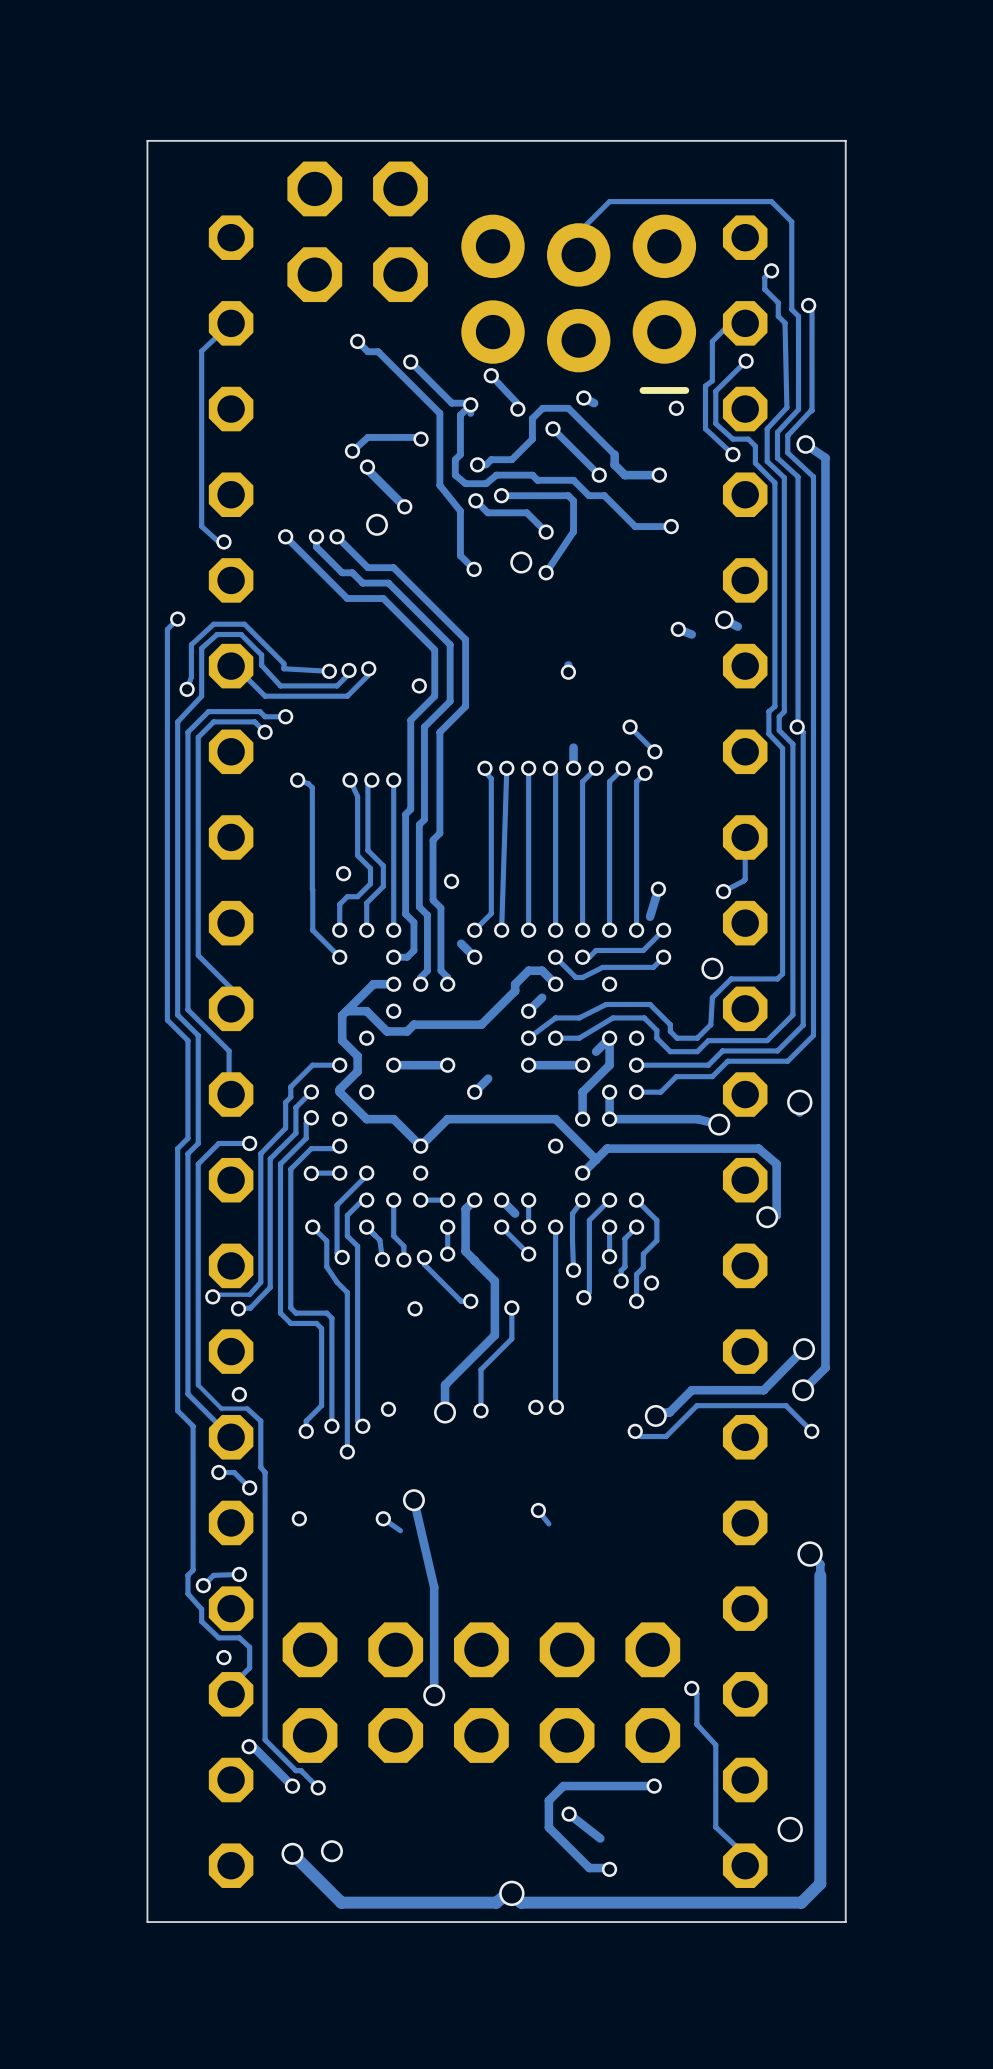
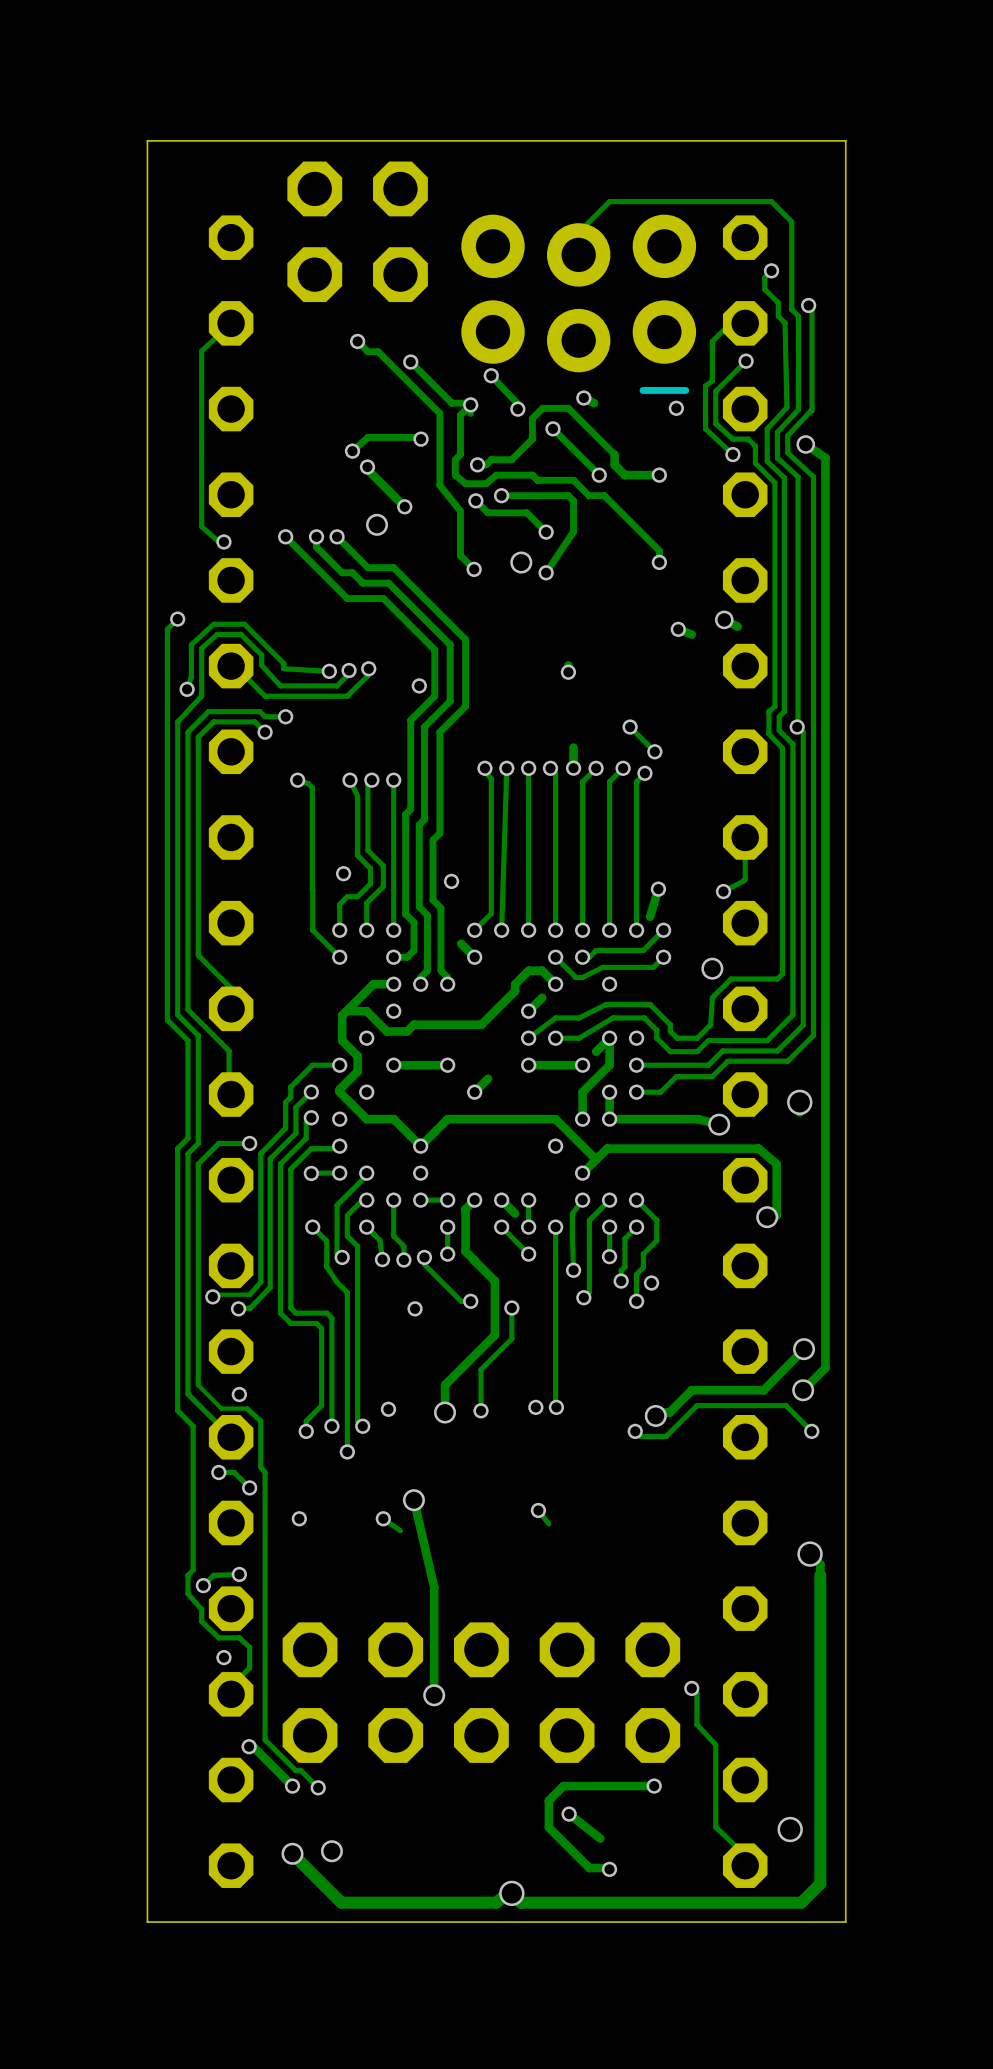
track: (671, 526) (635, 526) -> (659, 562) (659, 550) (635, 526)
via position: (671, 526) -> (659, 562)

